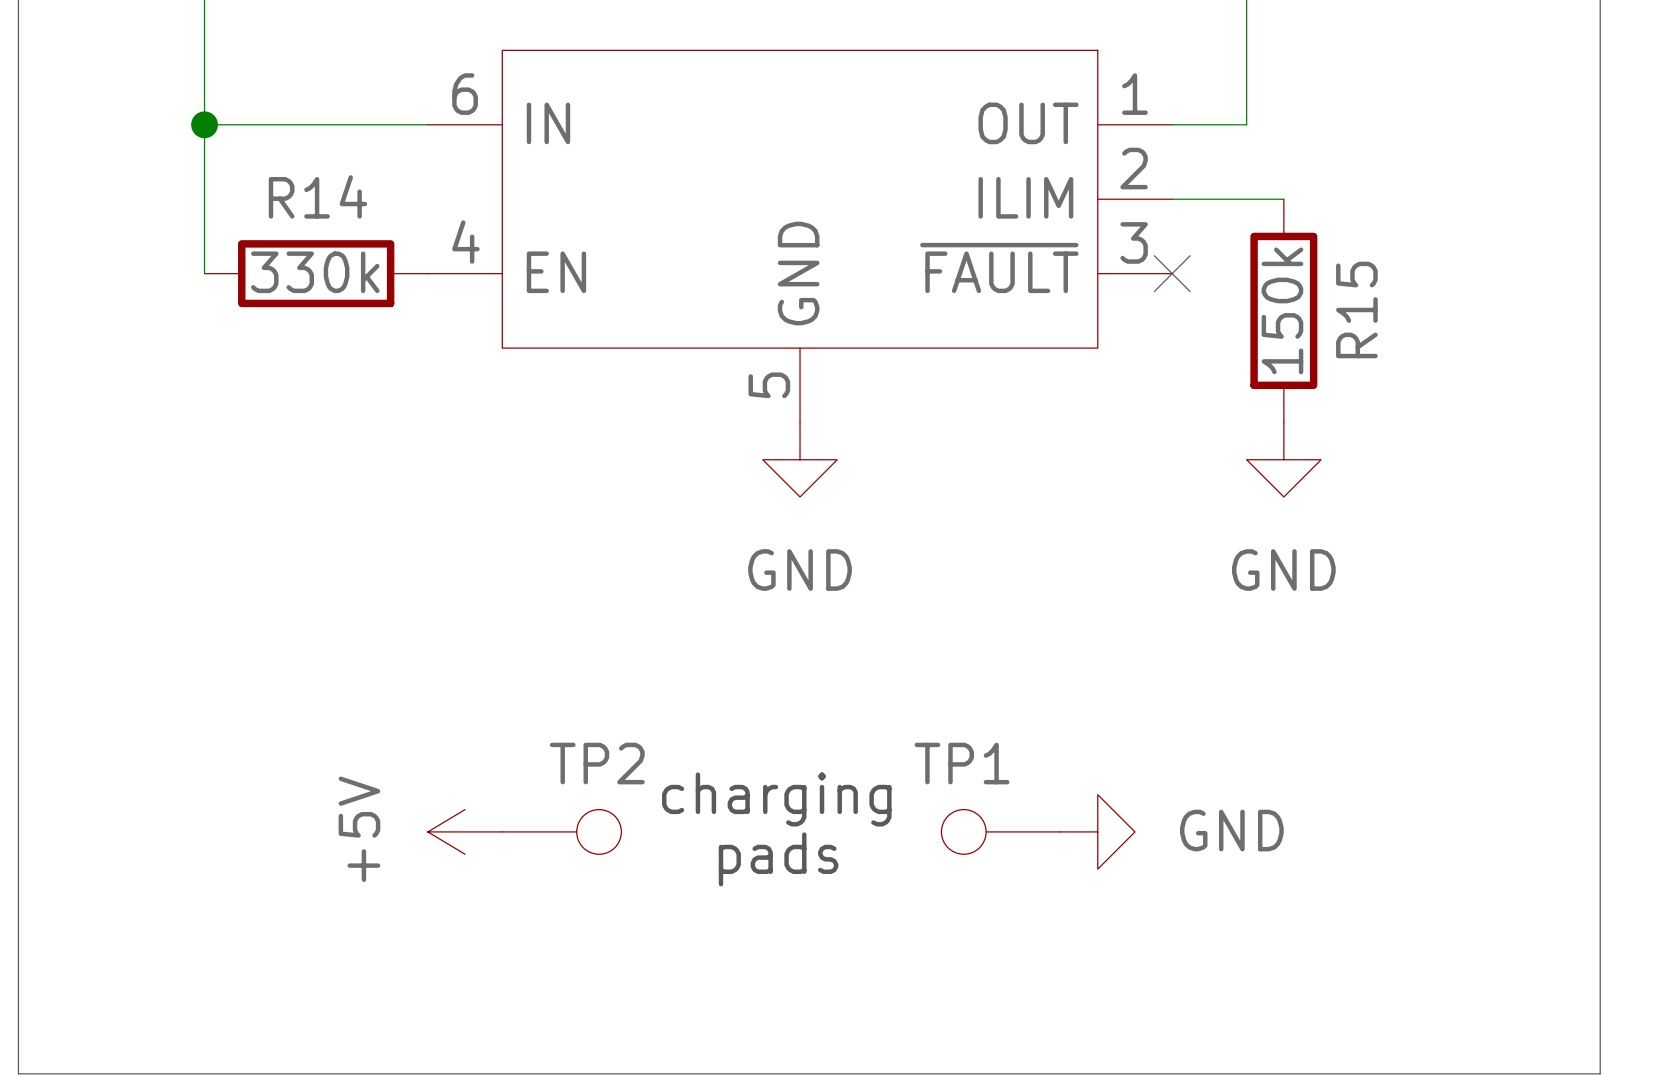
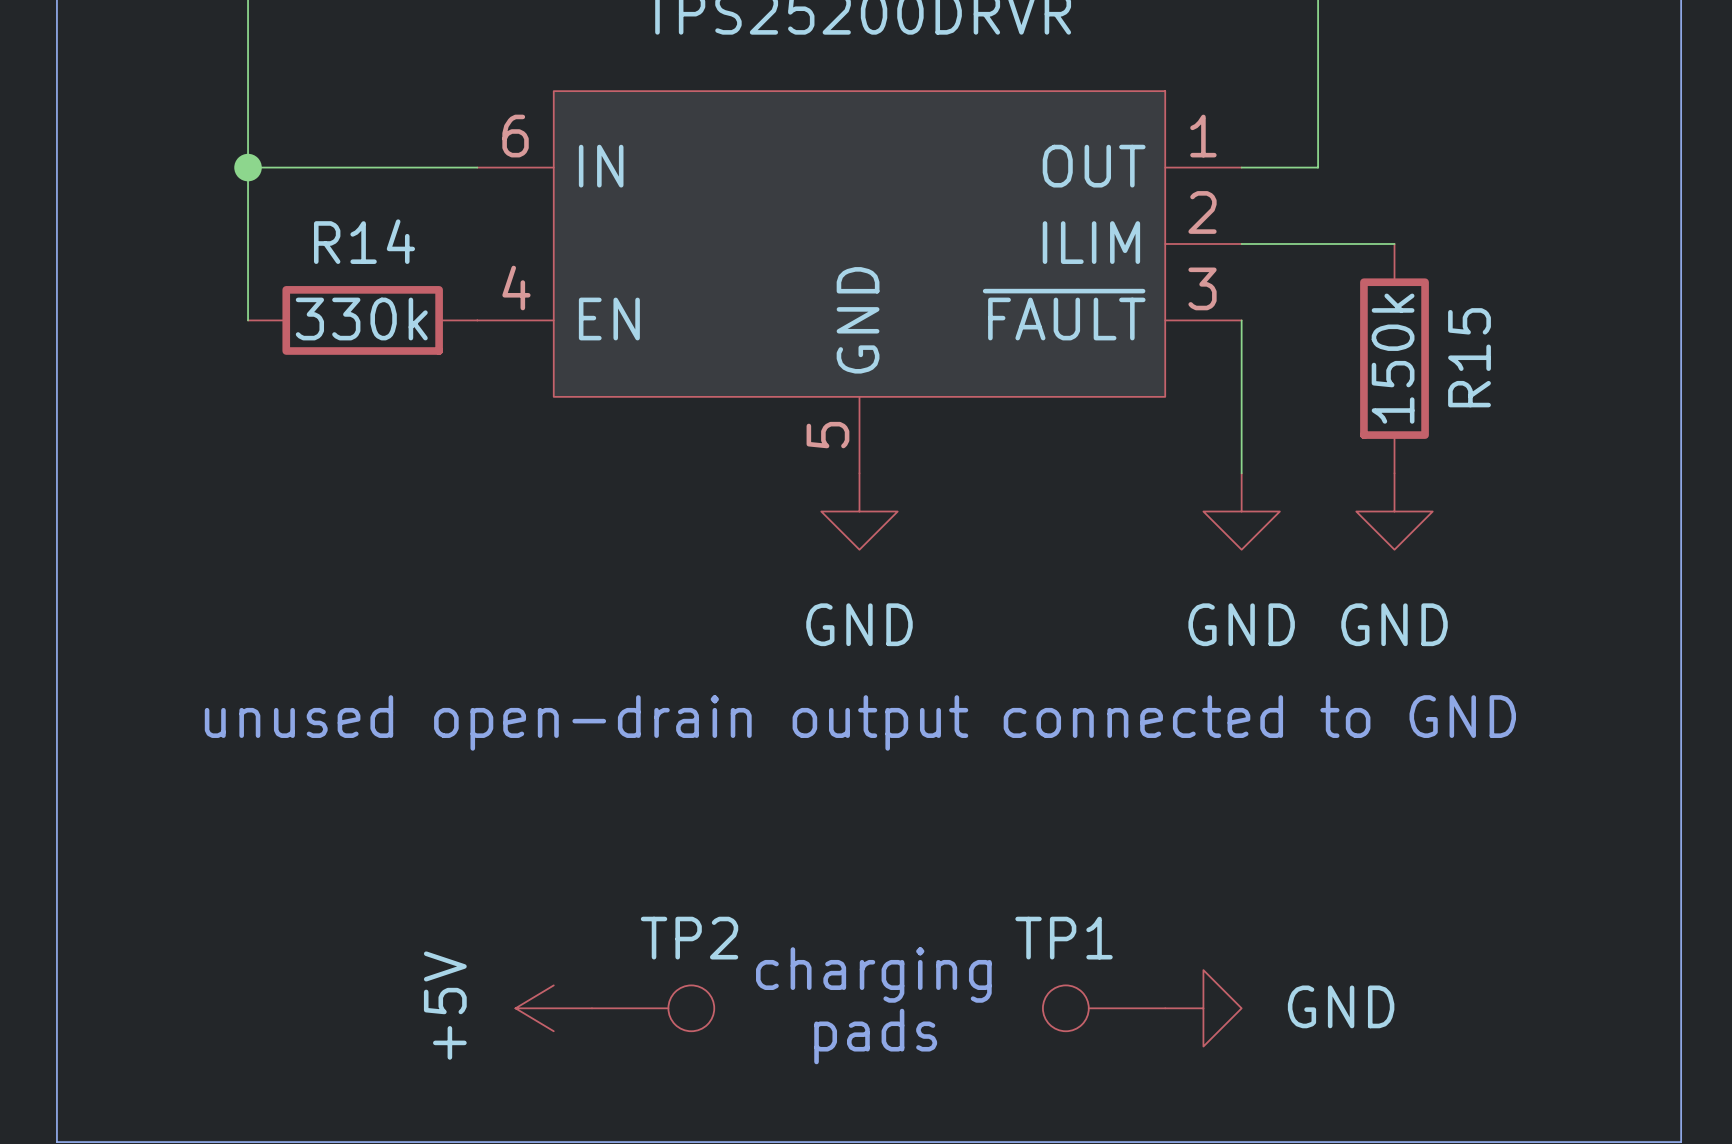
wire: none -> (1356, 244) (1394, 244)
wire: none -> (1241, 320) (1241, 473)
no-connect mark: (1172, 273) -> none
R15 position: (1283, 310) -> (1394, 358)
power symbol: none -> GND (1241, 511)
power symbol position: GND (1283, 459) -> GND (1394, 511)
text: none -> unused open-drain output connected to GND (860, 722)
text position: charging (776, 799) -> charging (873, 974)
power symbol position: +5V (465, 831) -> +5V (553, 1008)
TP2 position: (561, 831) -> (653, 1008)
TP1 position: (1001, 831) -> (1104, 1008)
power symbol position: GND (1097, 831) -> GND (1203, 1008)
text position: pads (778, 859) -> pads (875, 1036)

